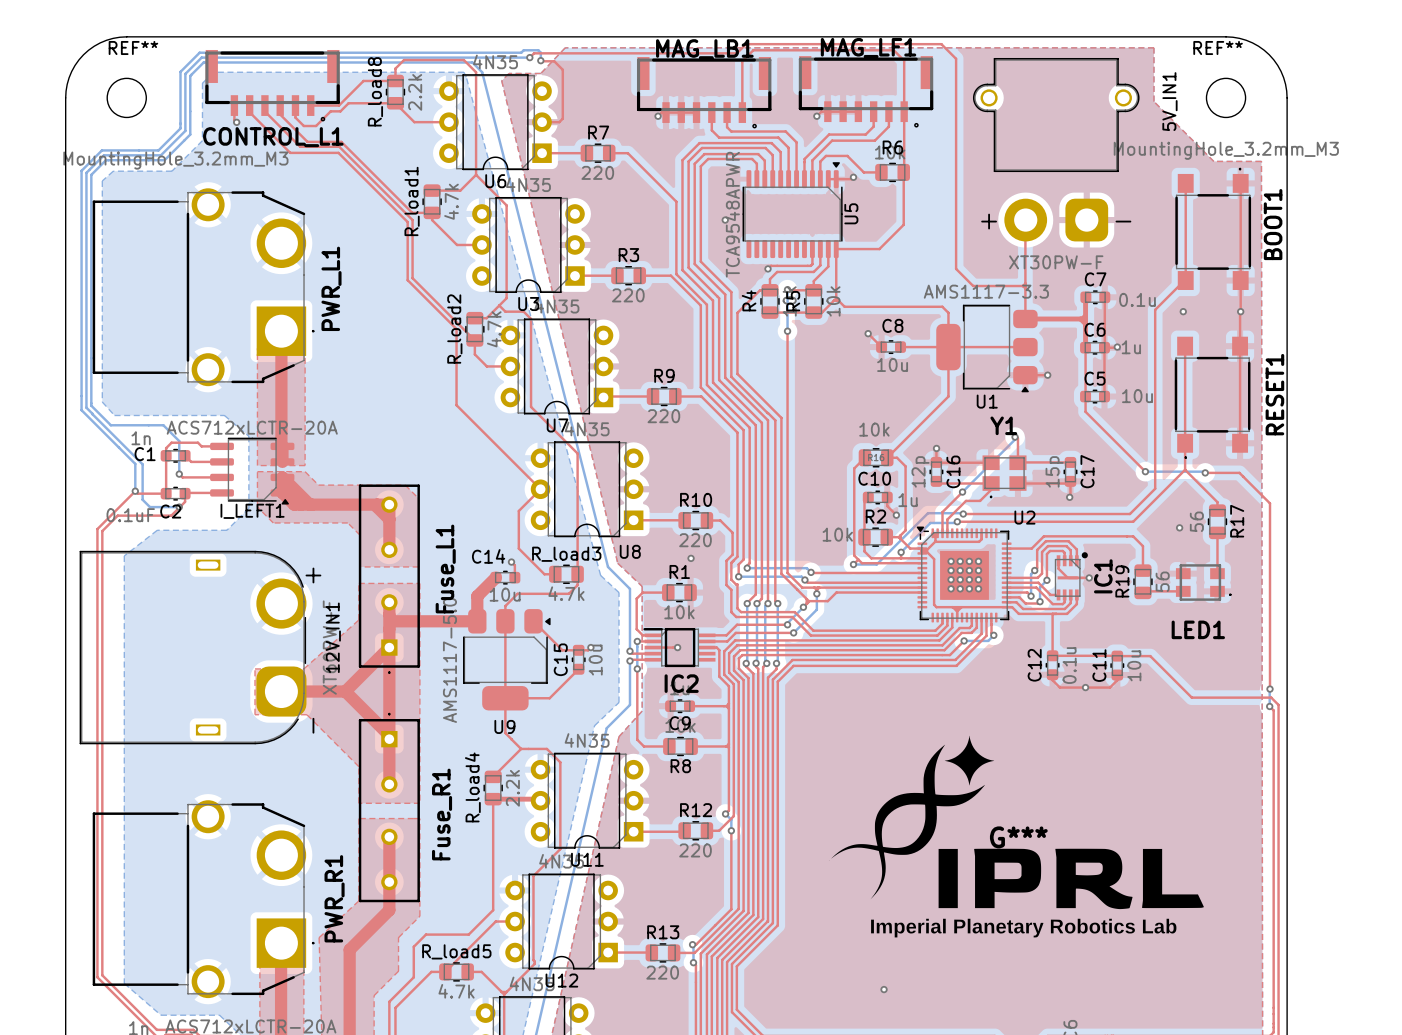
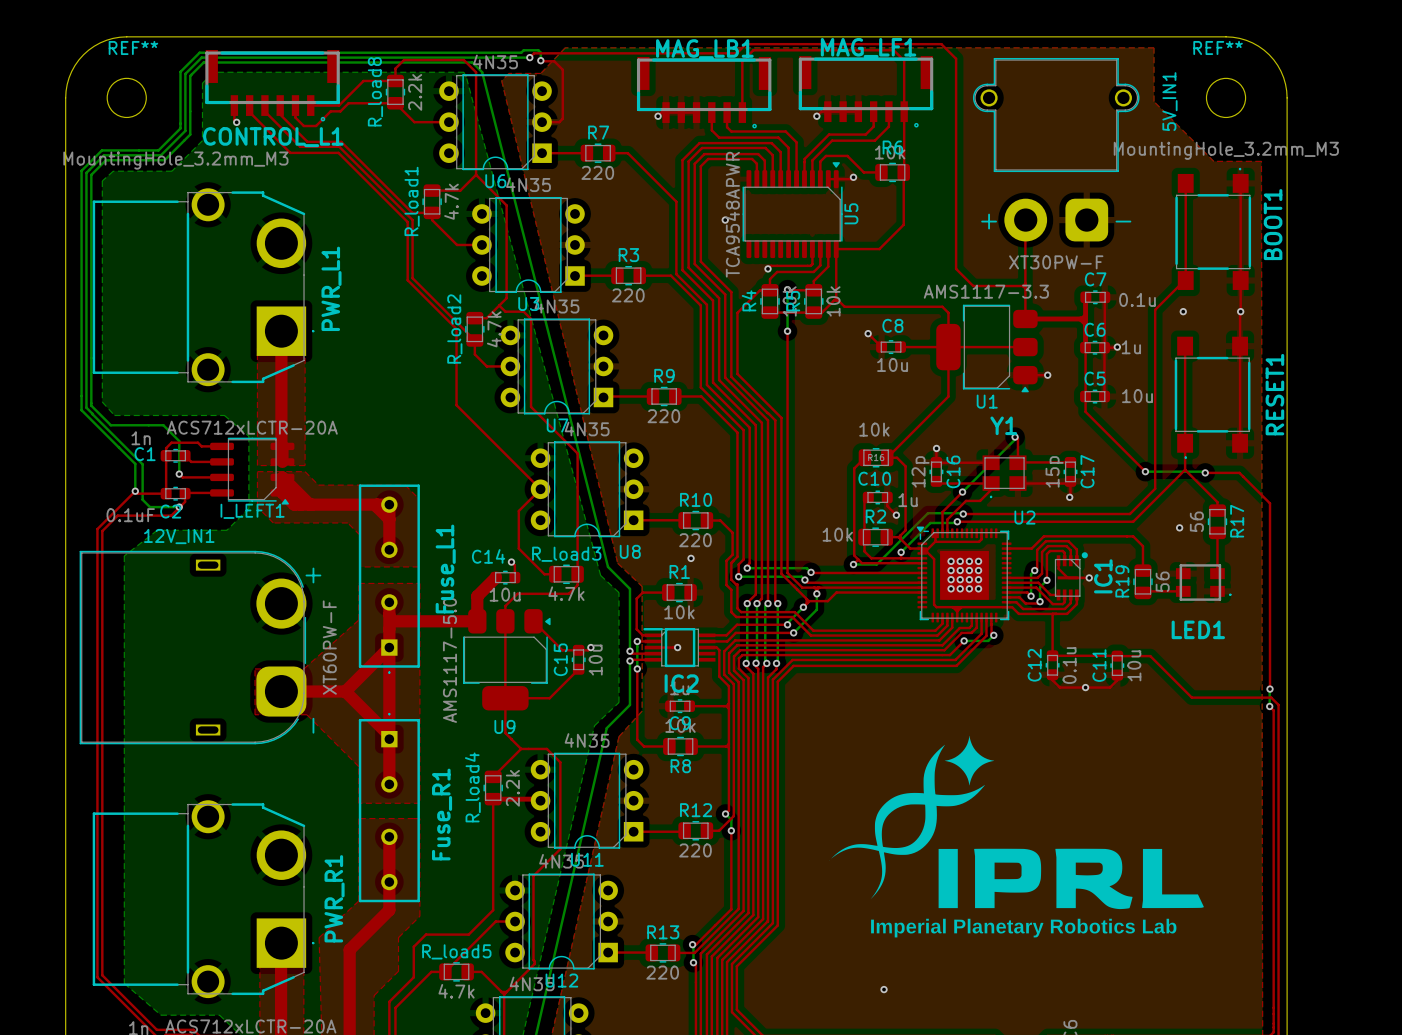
12V_IN1 name rotation: 0° (333, 637) -> 90° clockwise (179, 536)
12V_IN1 name position: 12V_IN1 (333, 637) -> 12V_IN1 (179, 536)
drawing: none -> [828, 735, 1204, 938]
G***: (1016, 836) -> none

